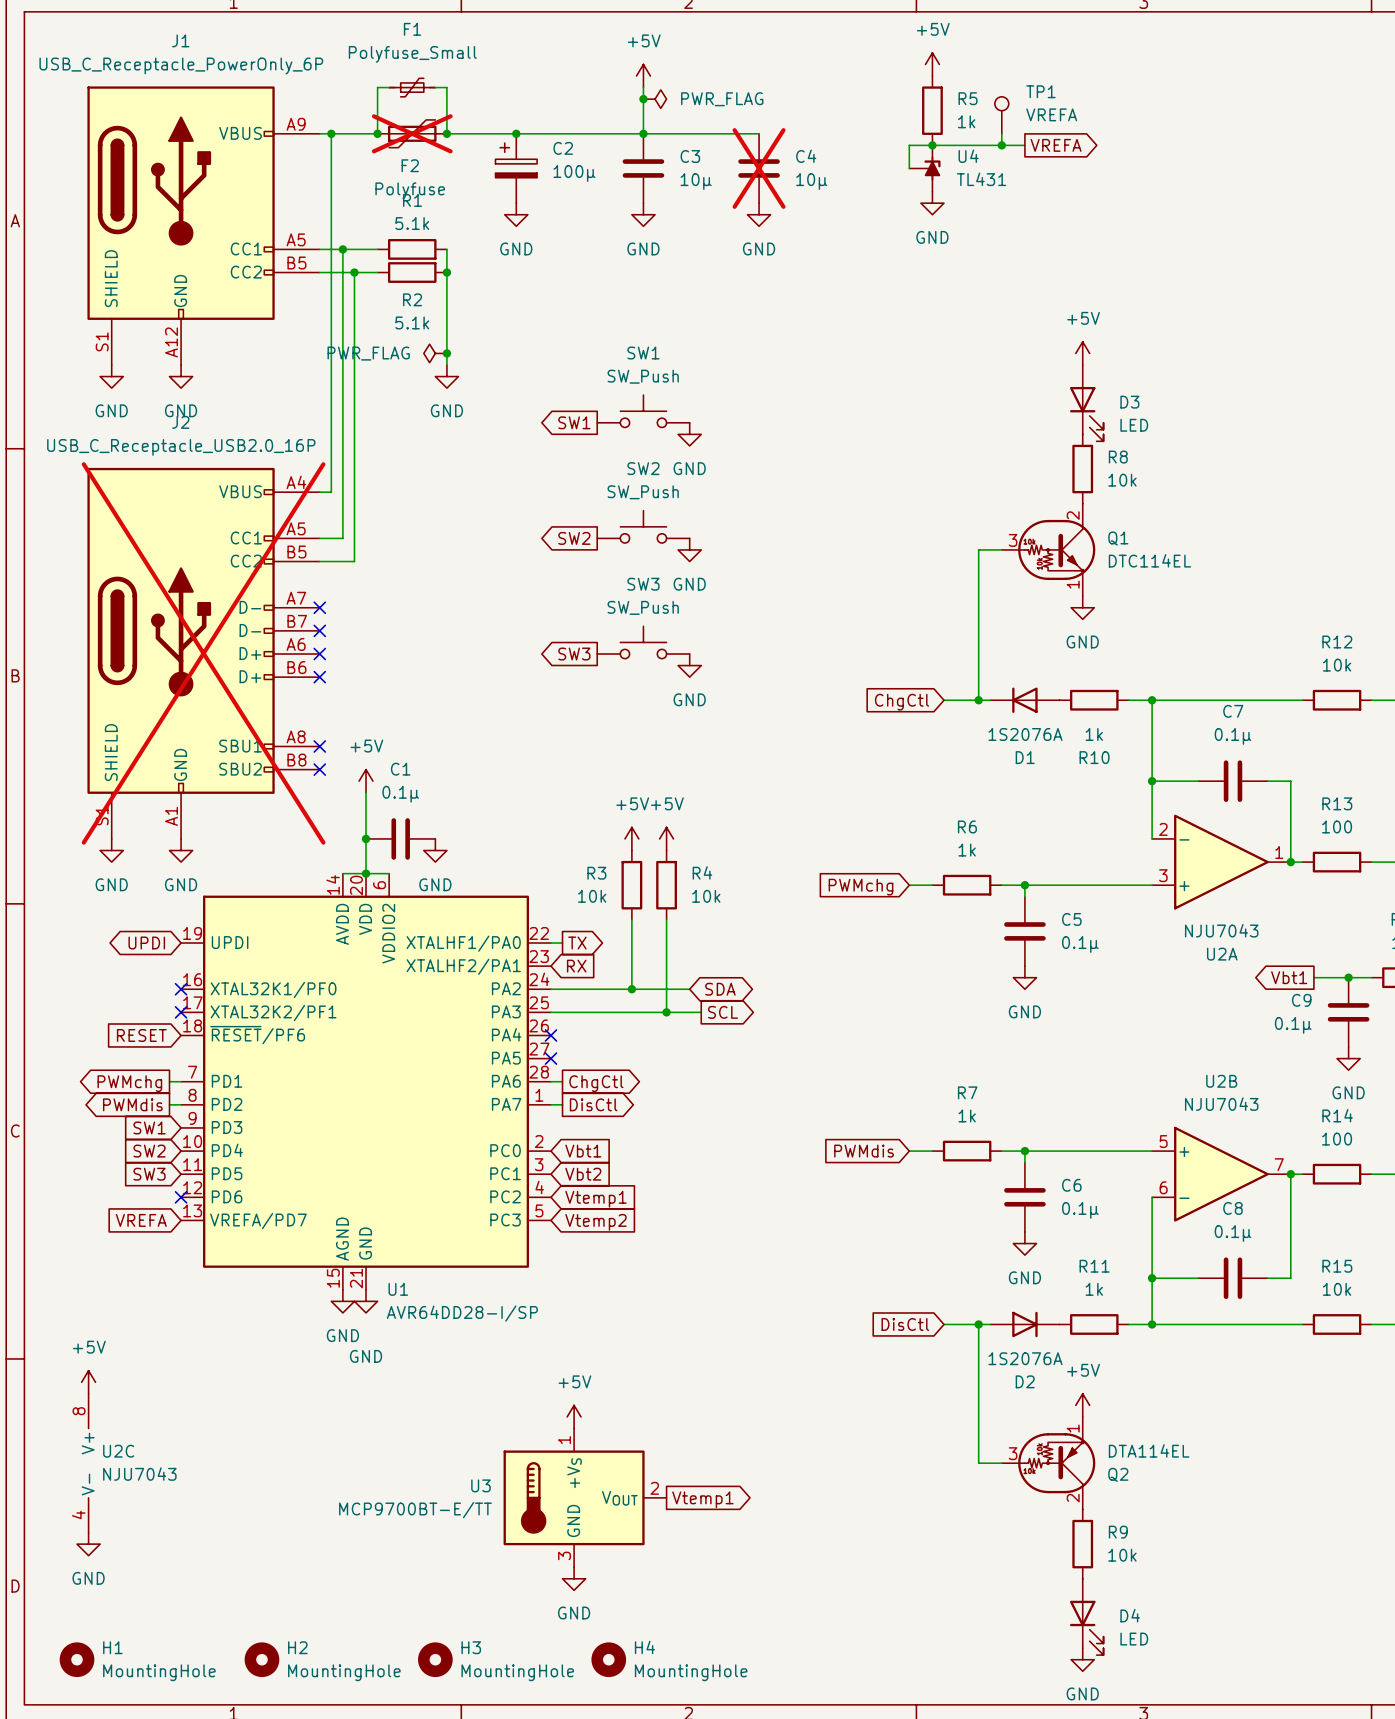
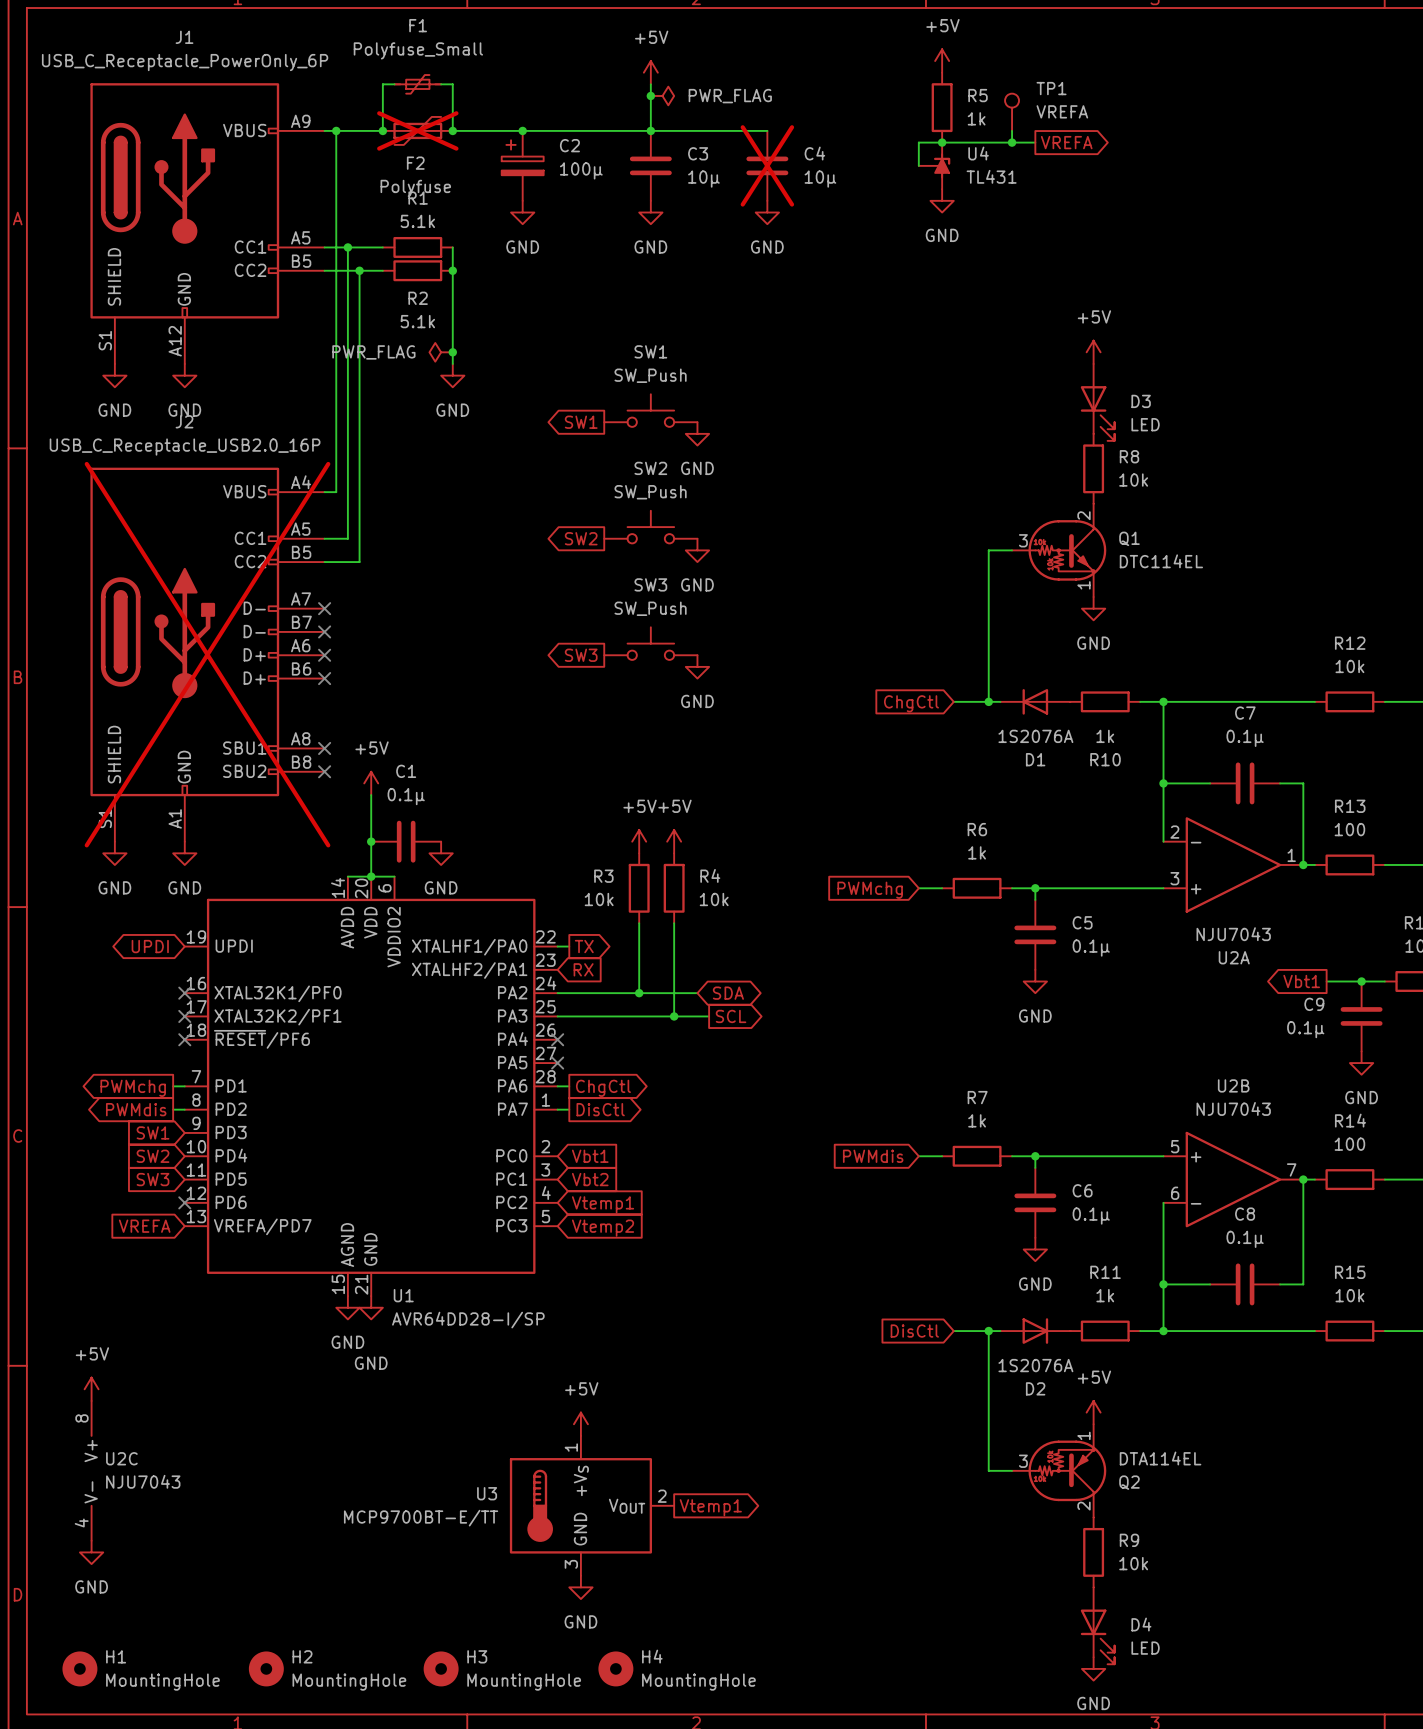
global label: RESET (141, 1035) -> none
no-connect mark: none -> (184, 1039)

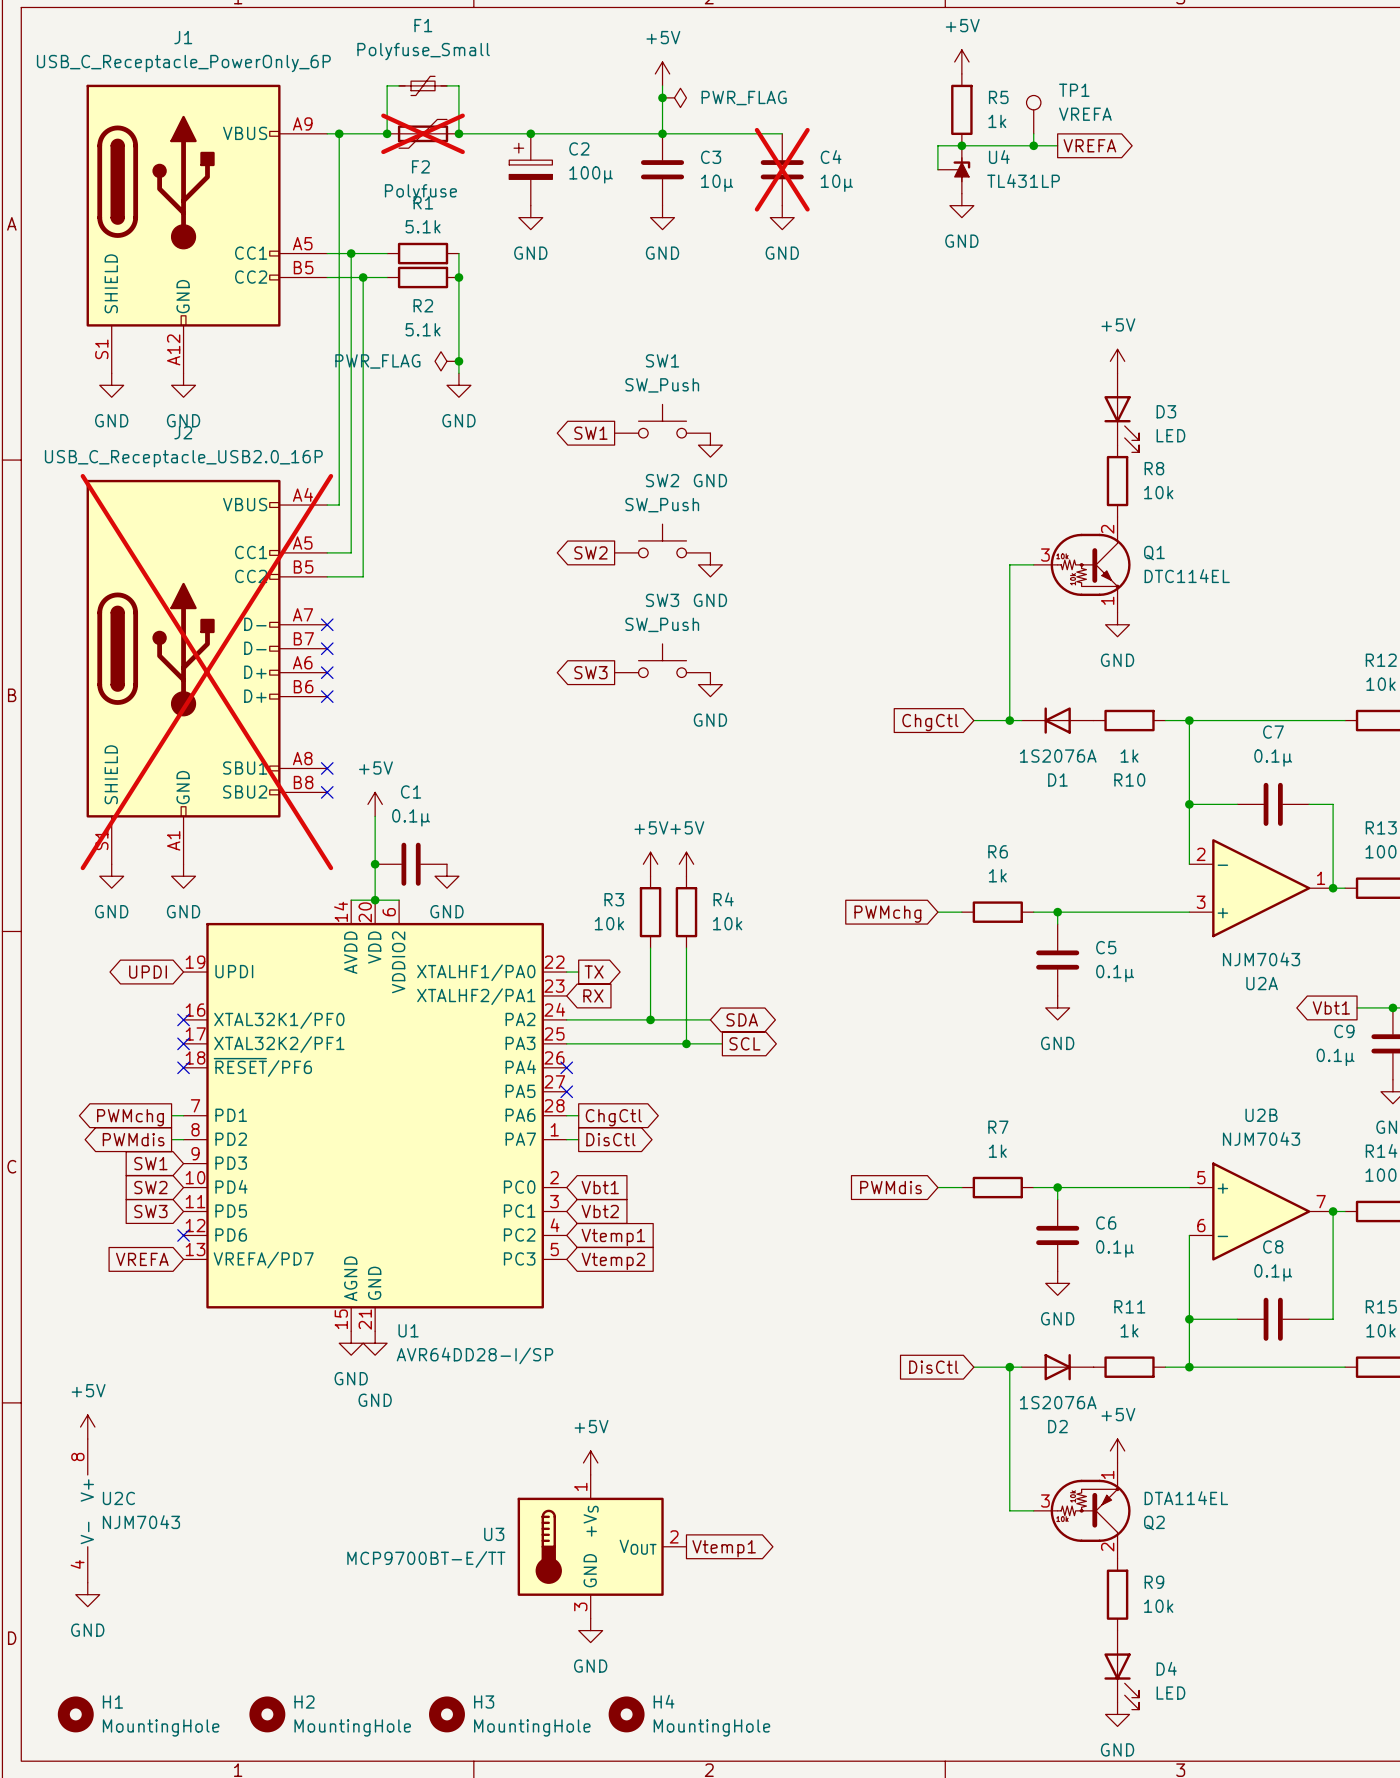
U4 value: TL431 (991, 176) -> TL431LP (1023, 180)
U2A value: NJU7043 (1233, 934) -> NJM7043 (1261, 959)
U2B value: NJU7043 (1233, 1108) -> NJM7043 (1261, 1138)
U2C value: NJU7043 (143, 1481) -> NJM7043 (141, 1522)

